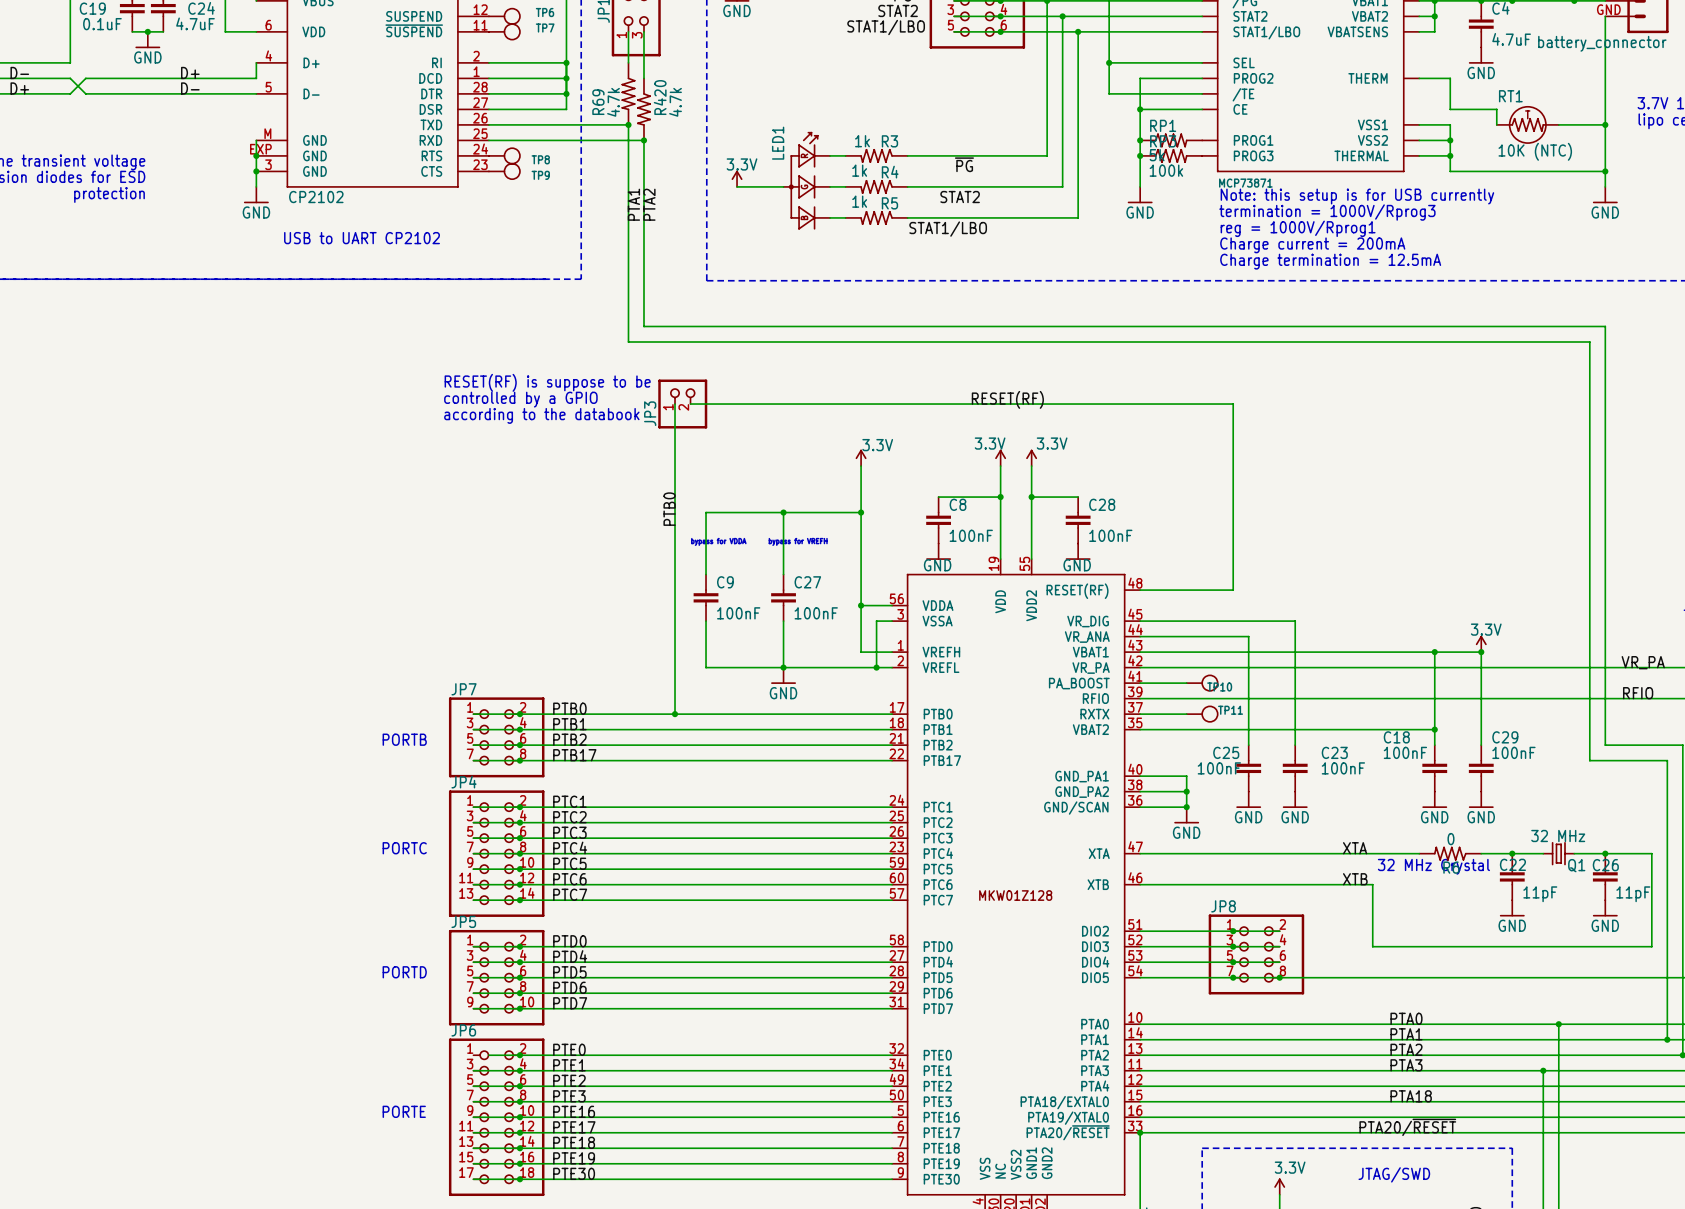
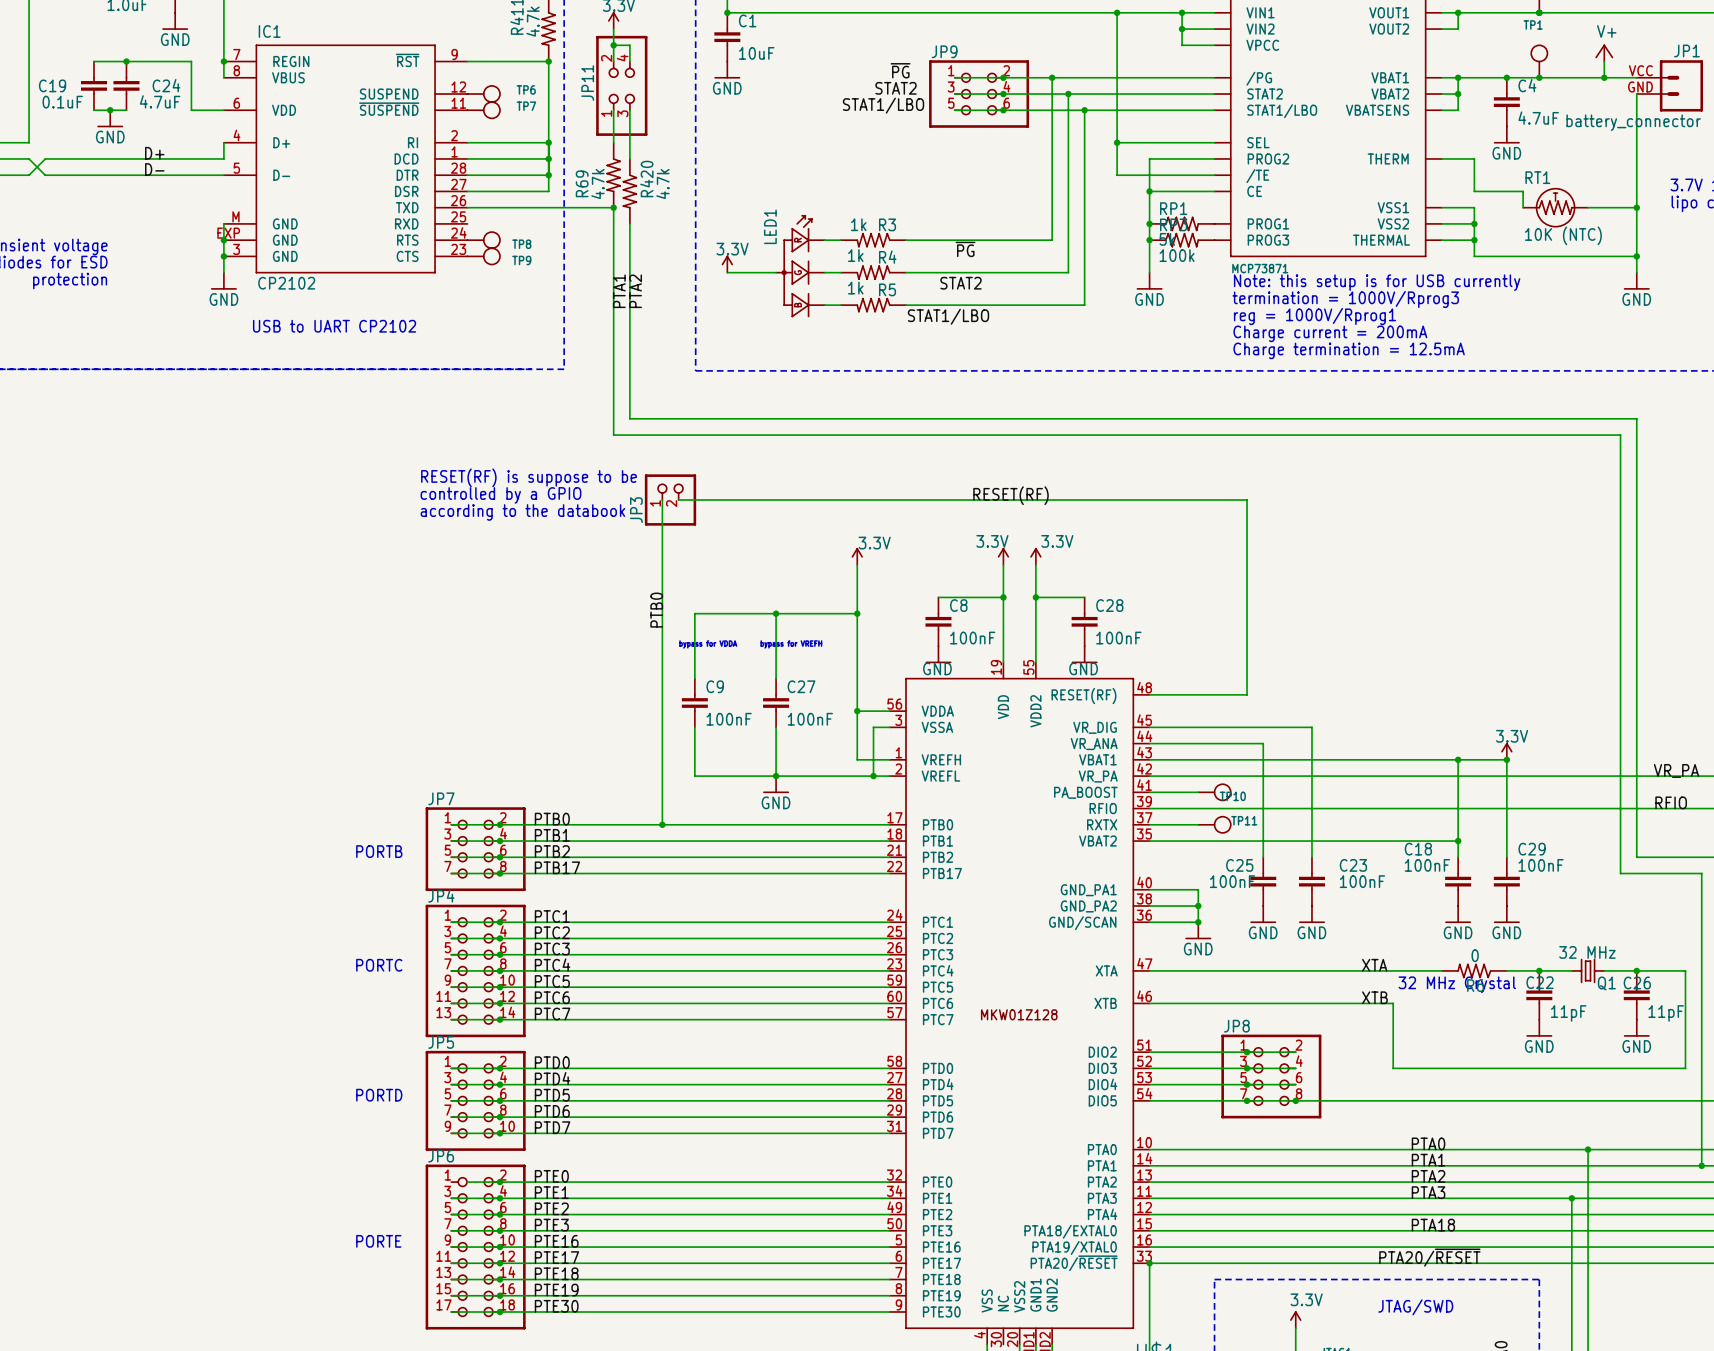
wire: (488, 140) (643, 140) -> none
junction: (643, 140) -> none

